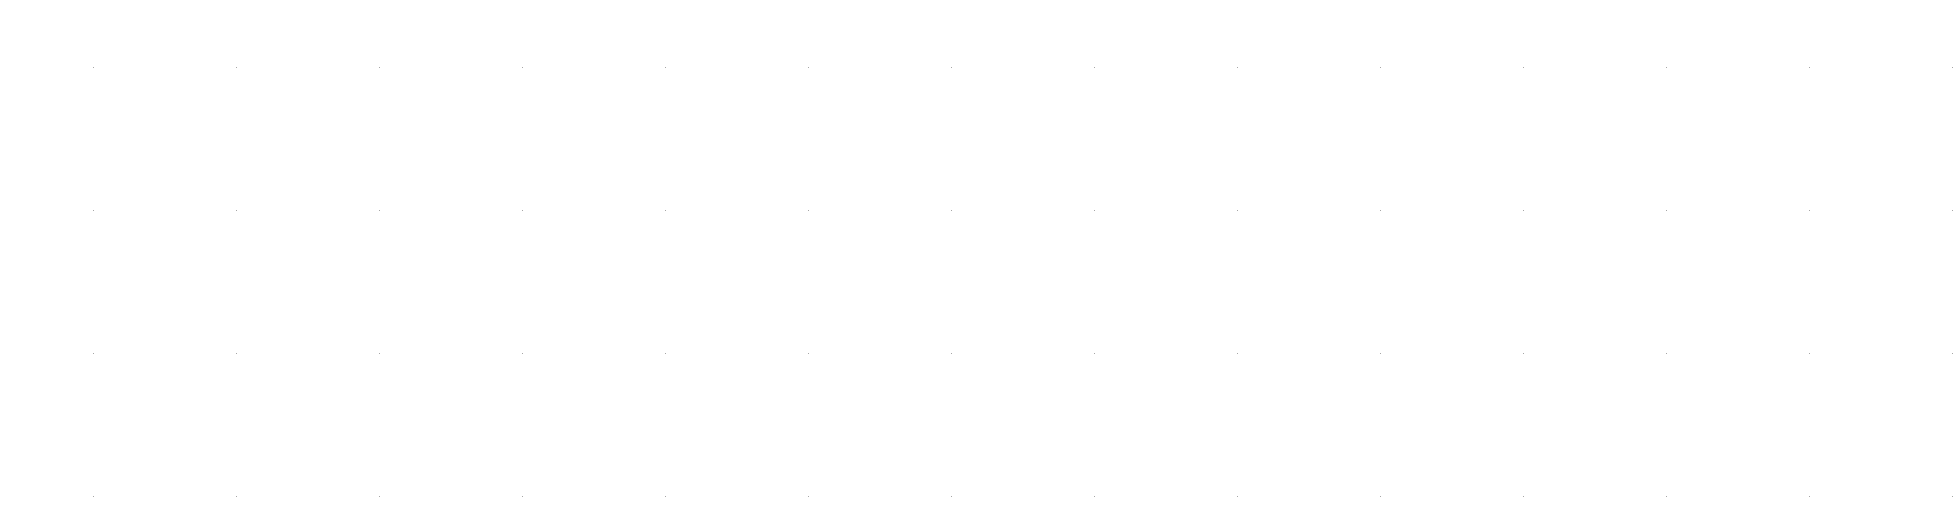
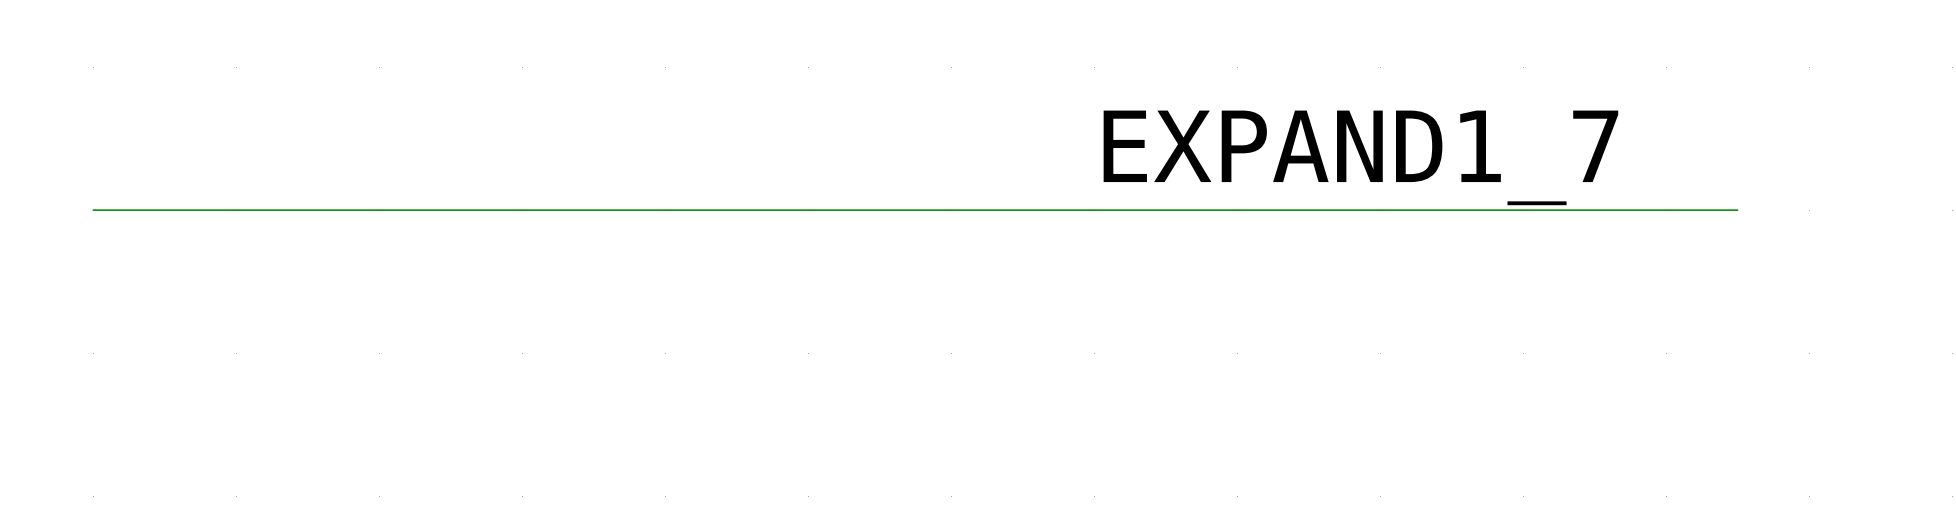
label: none -> EXPAND1_7 (1360, 157)
wire: none -> (93, 210) (1737, 210)

